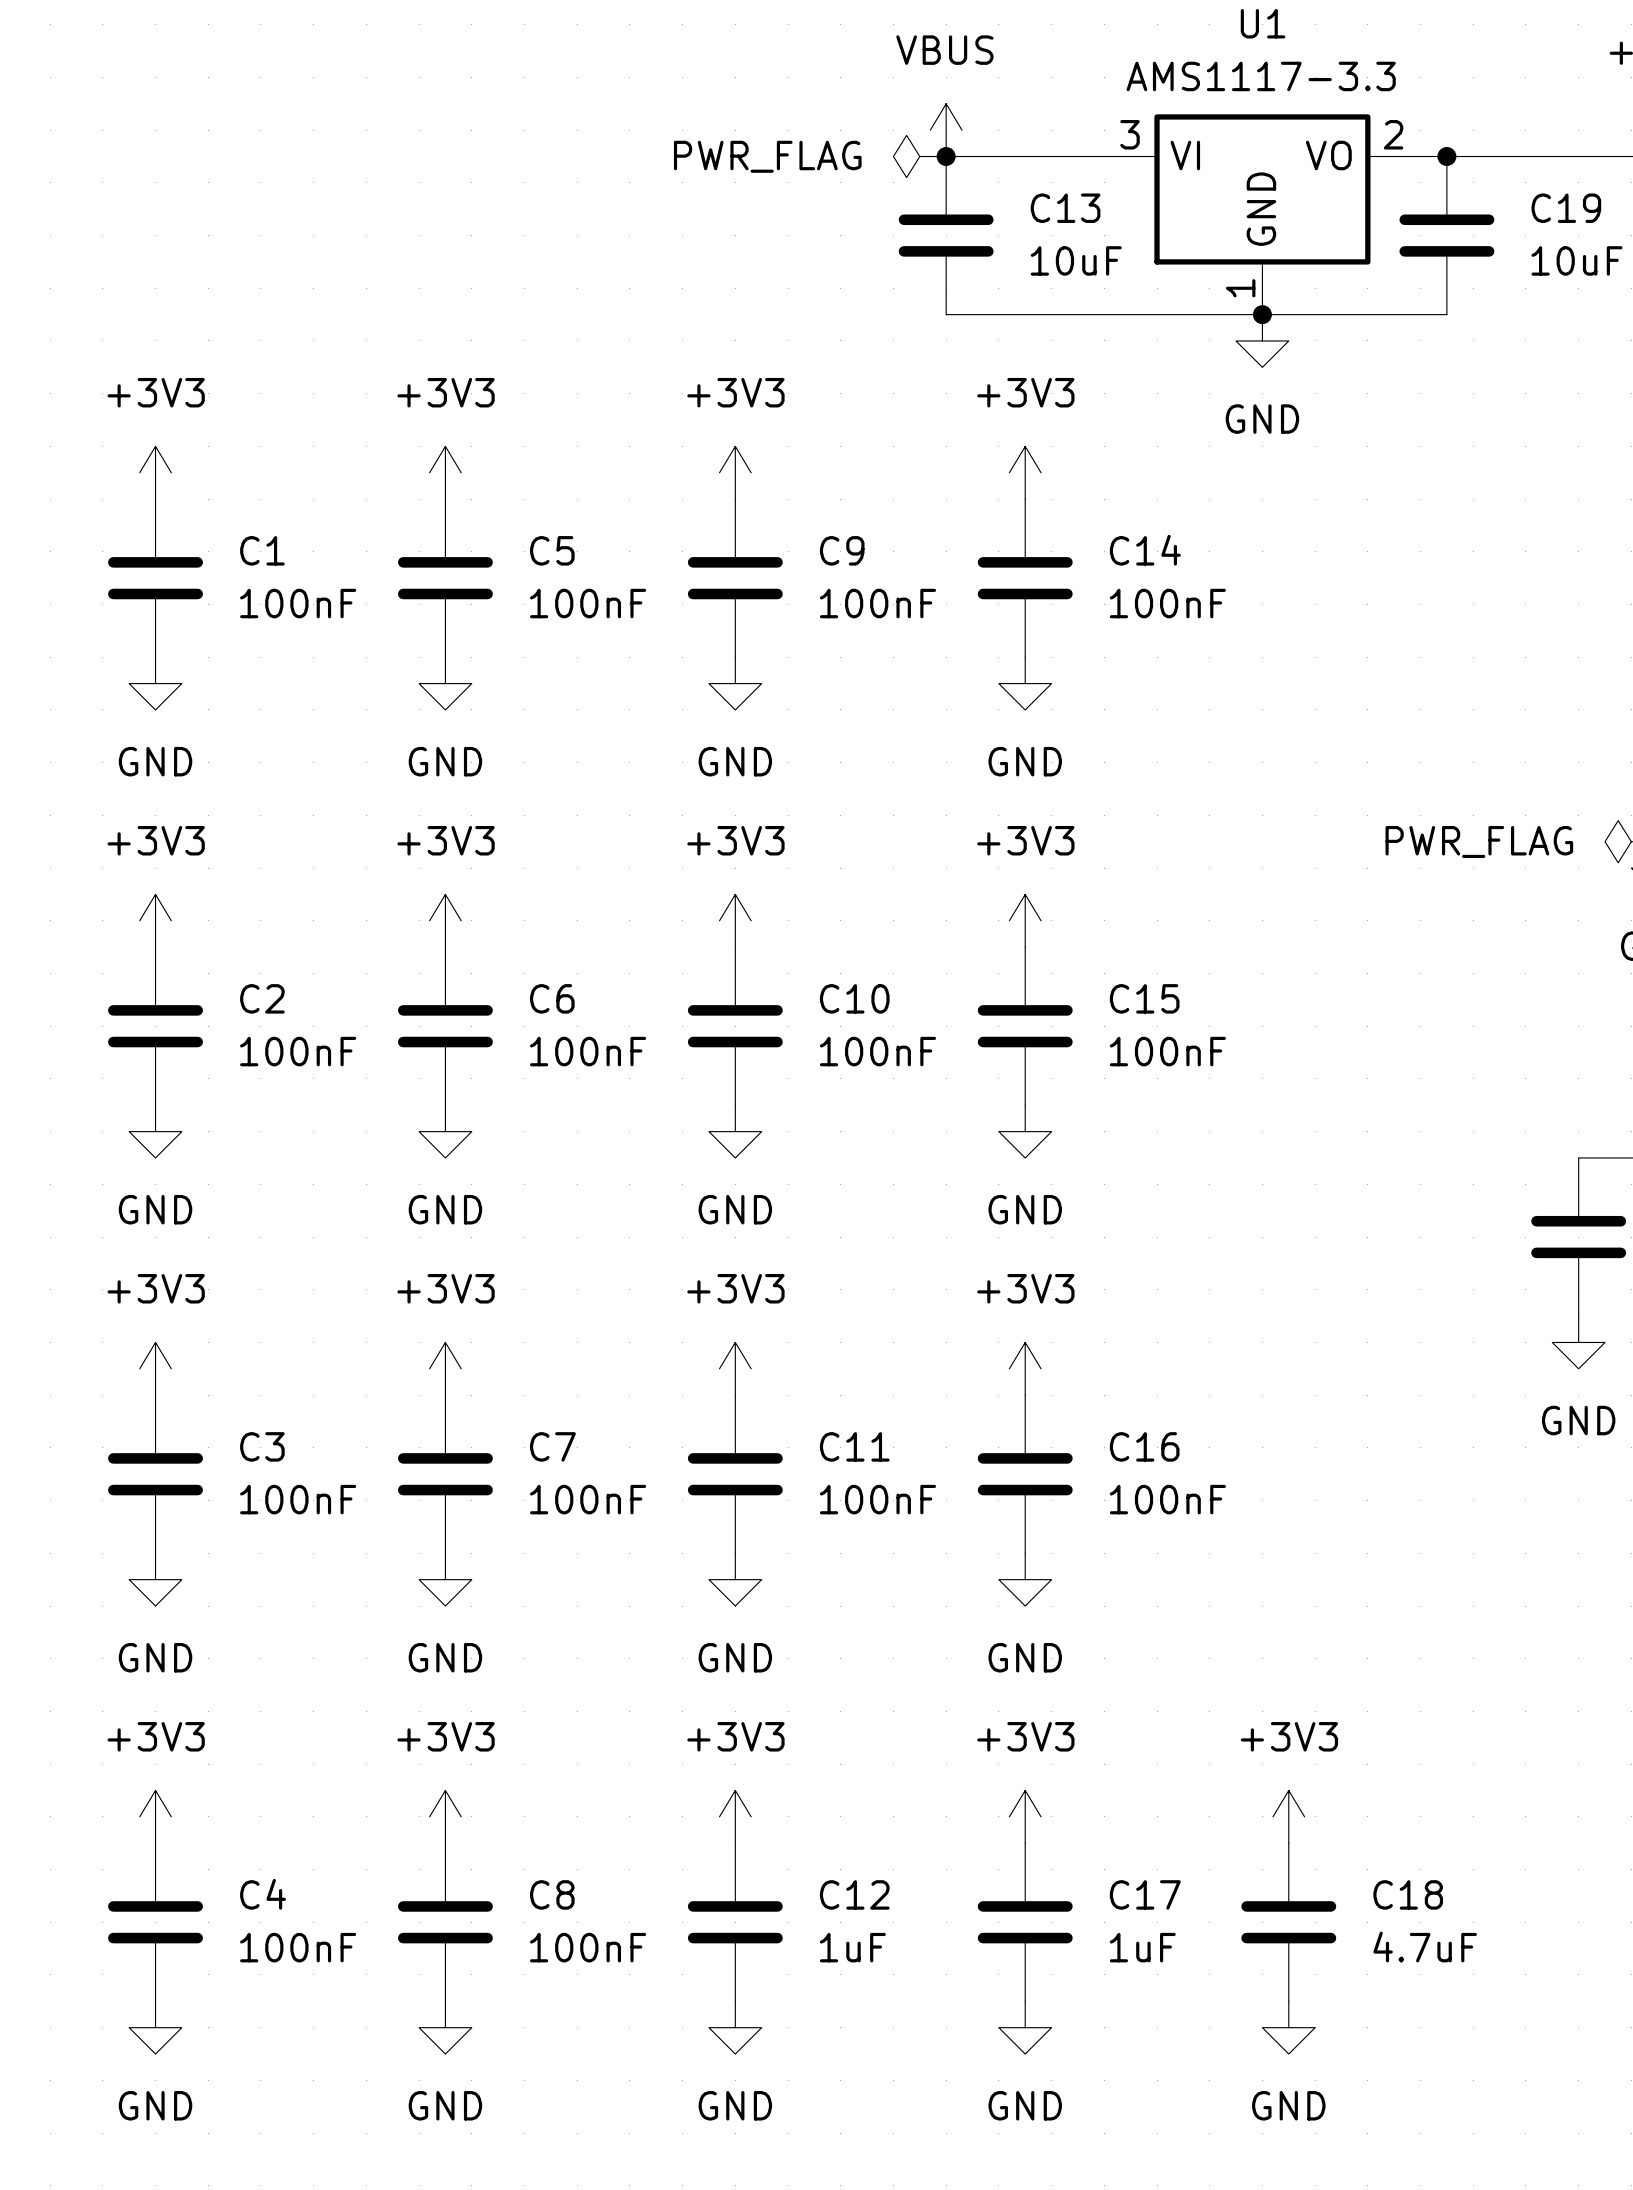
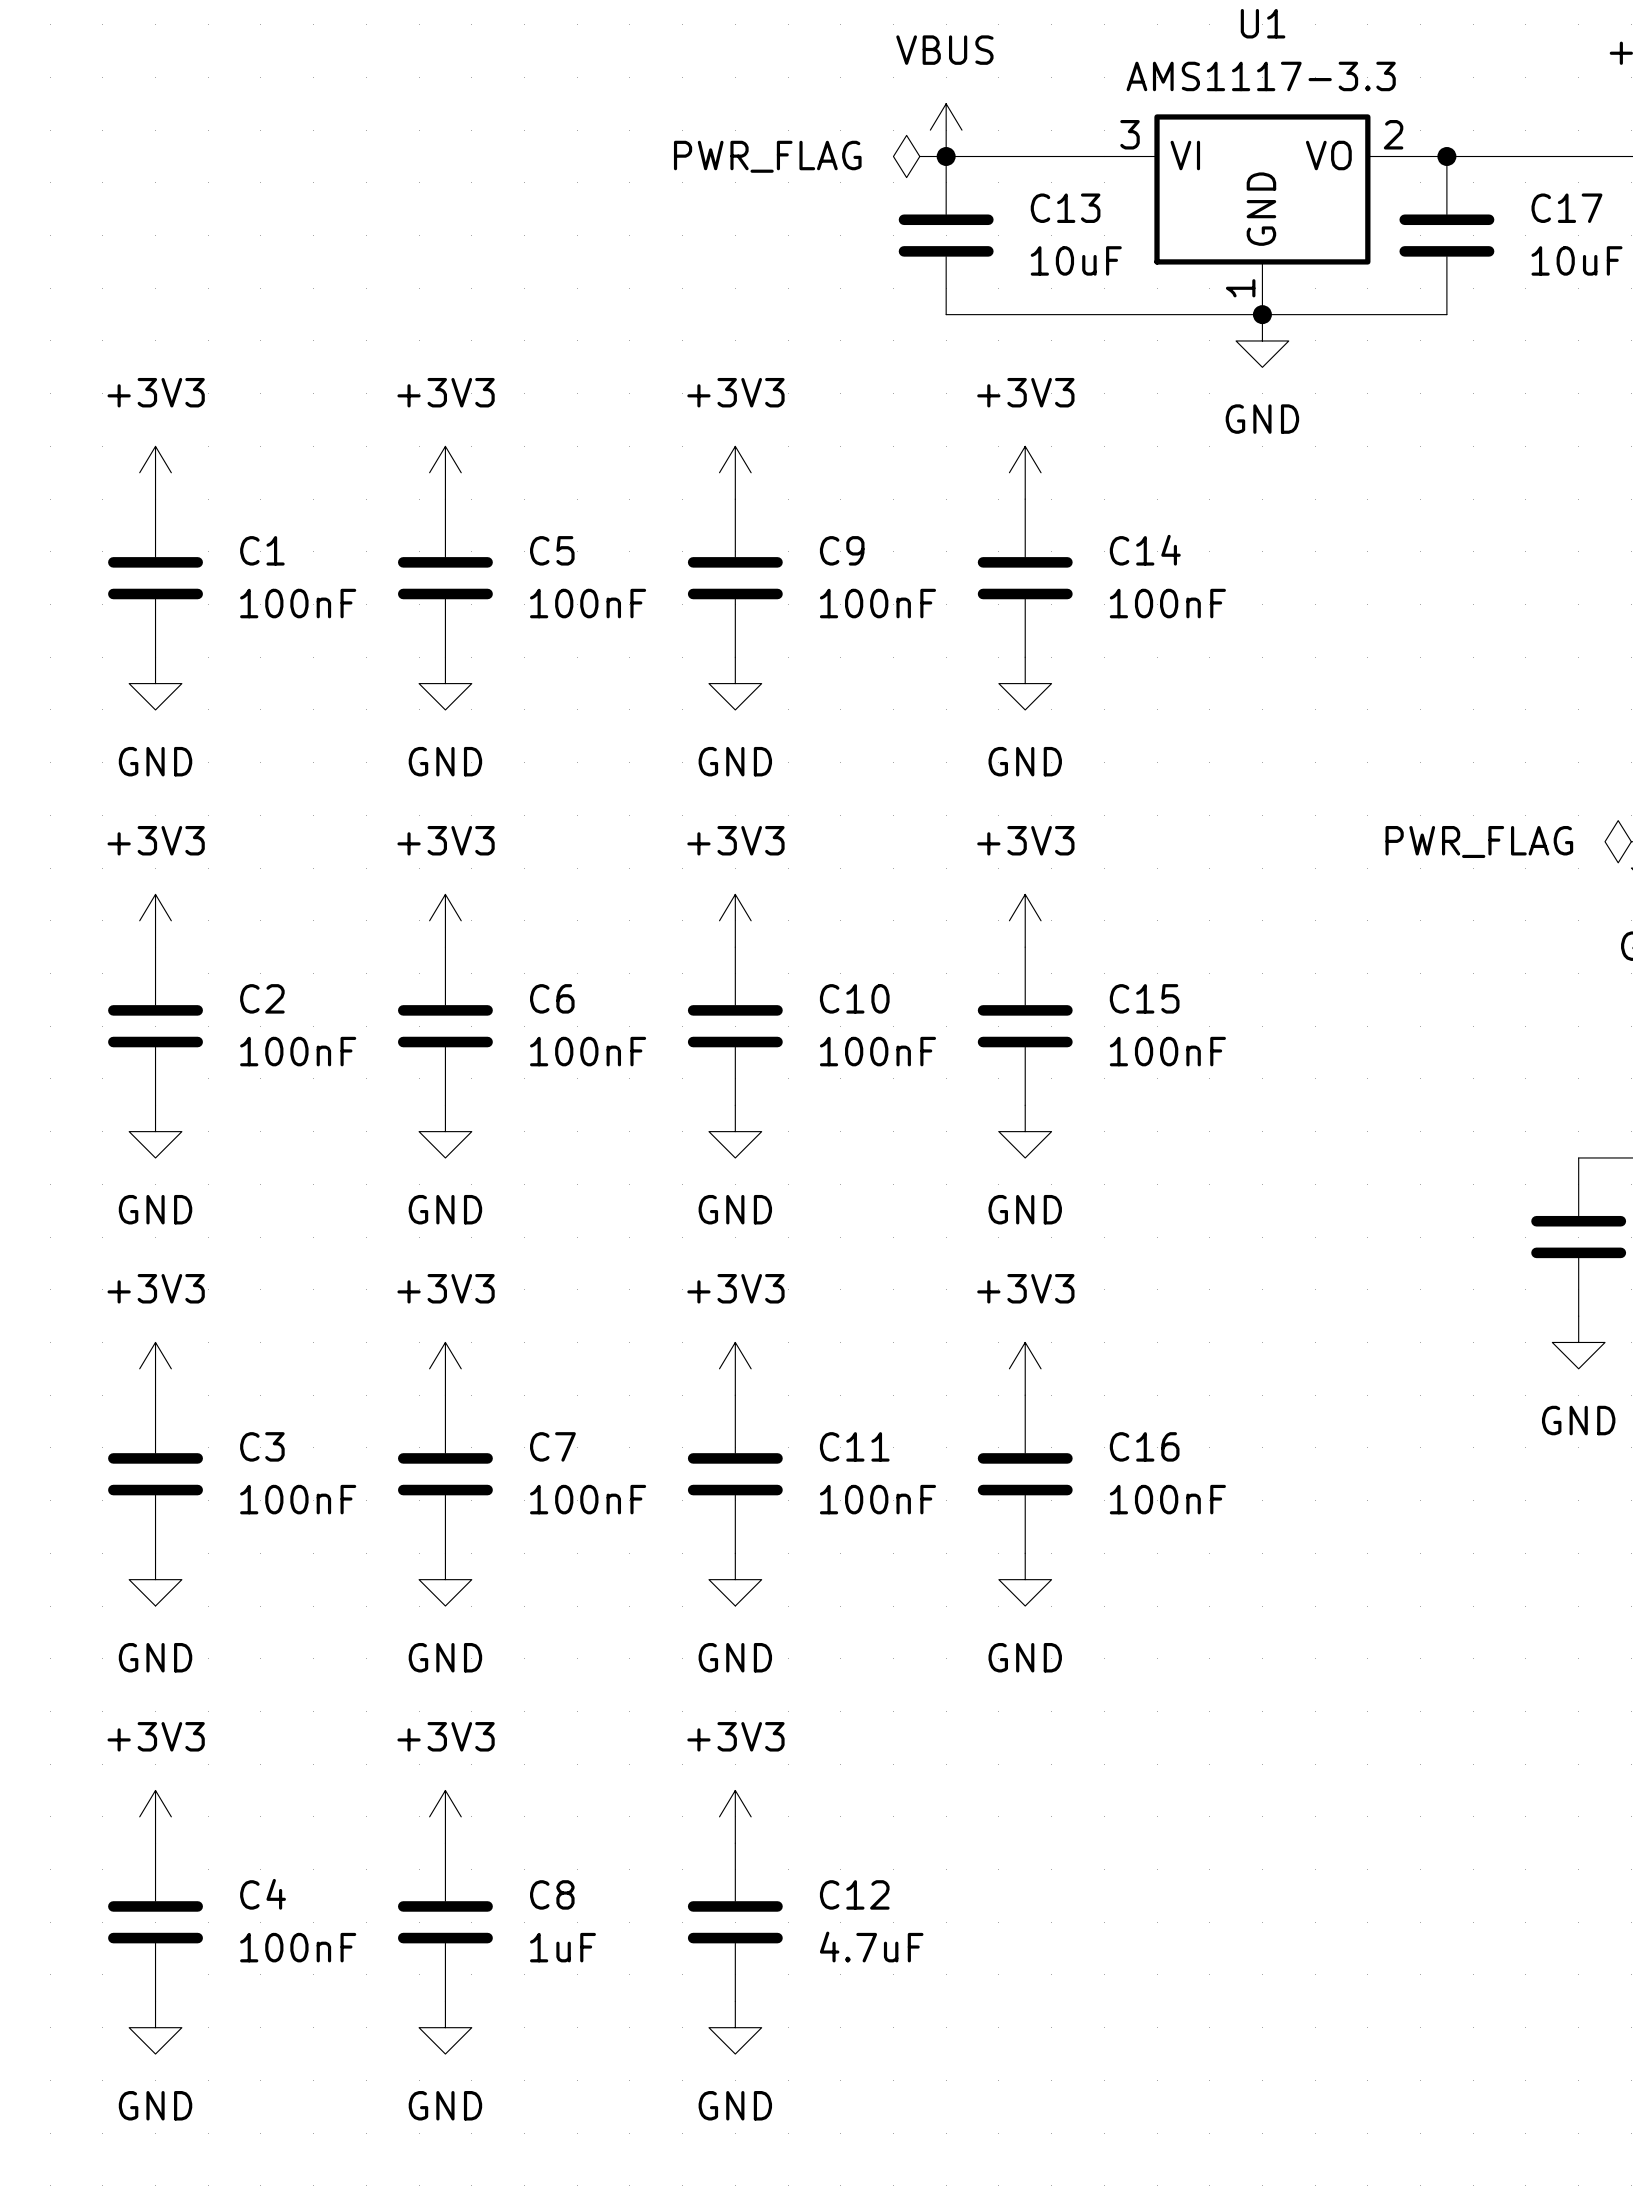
C19 name: C19 (1566, 208) -> C17 (1566, 208)
power symbol: +3V3 (1025, 1816) -> none
power symbol: +3V3 (1288, 1816) -> none
C17: 1uF (1025, 1922) -> none
C18: 4.7uF (1288, 1922) -> none
C8 value: 100nF (588, 1947) -> 1uF (562, 1947)
C12 value: 1uF (852, 1947) -> 4.7uF (871, 1947)
power symbol: GND (1025, 2027) -> none
power symbol: GND (1288, 2027) -> none

